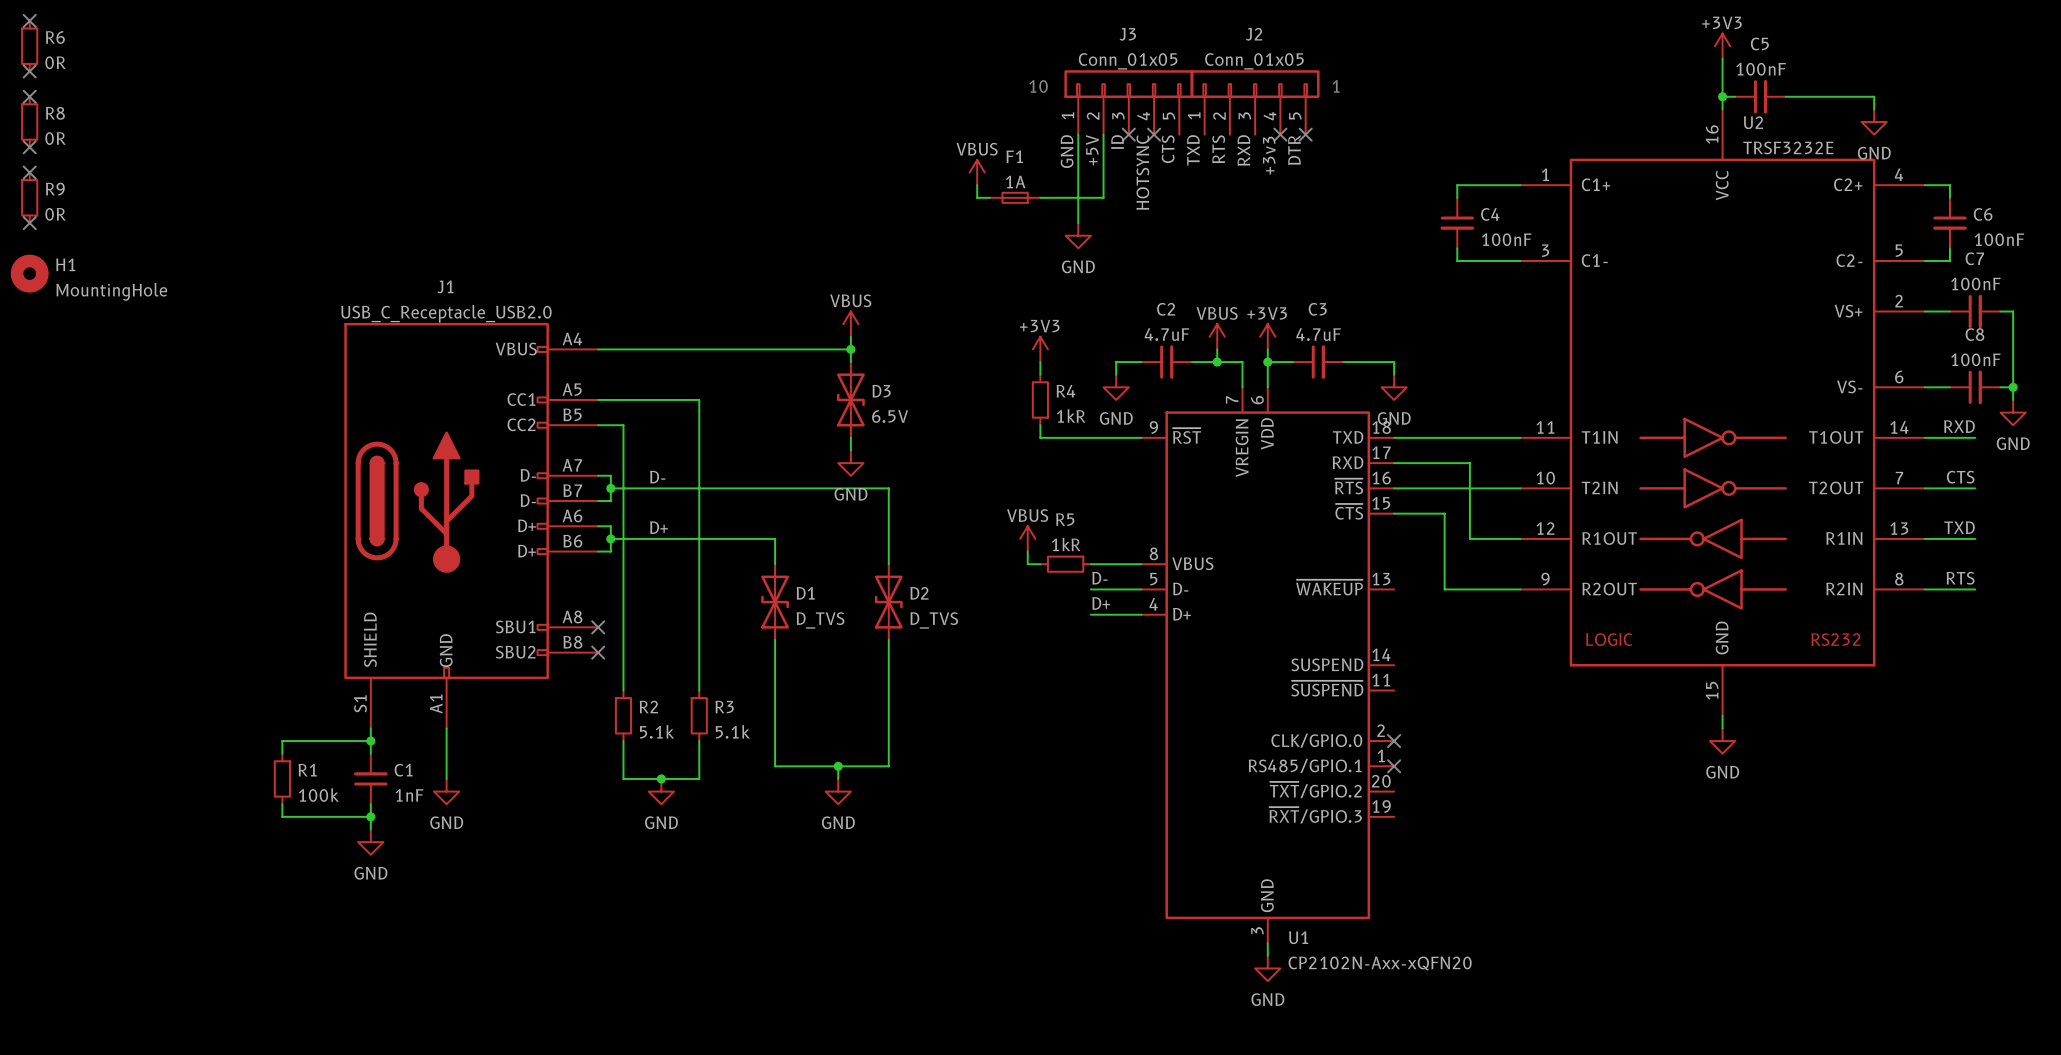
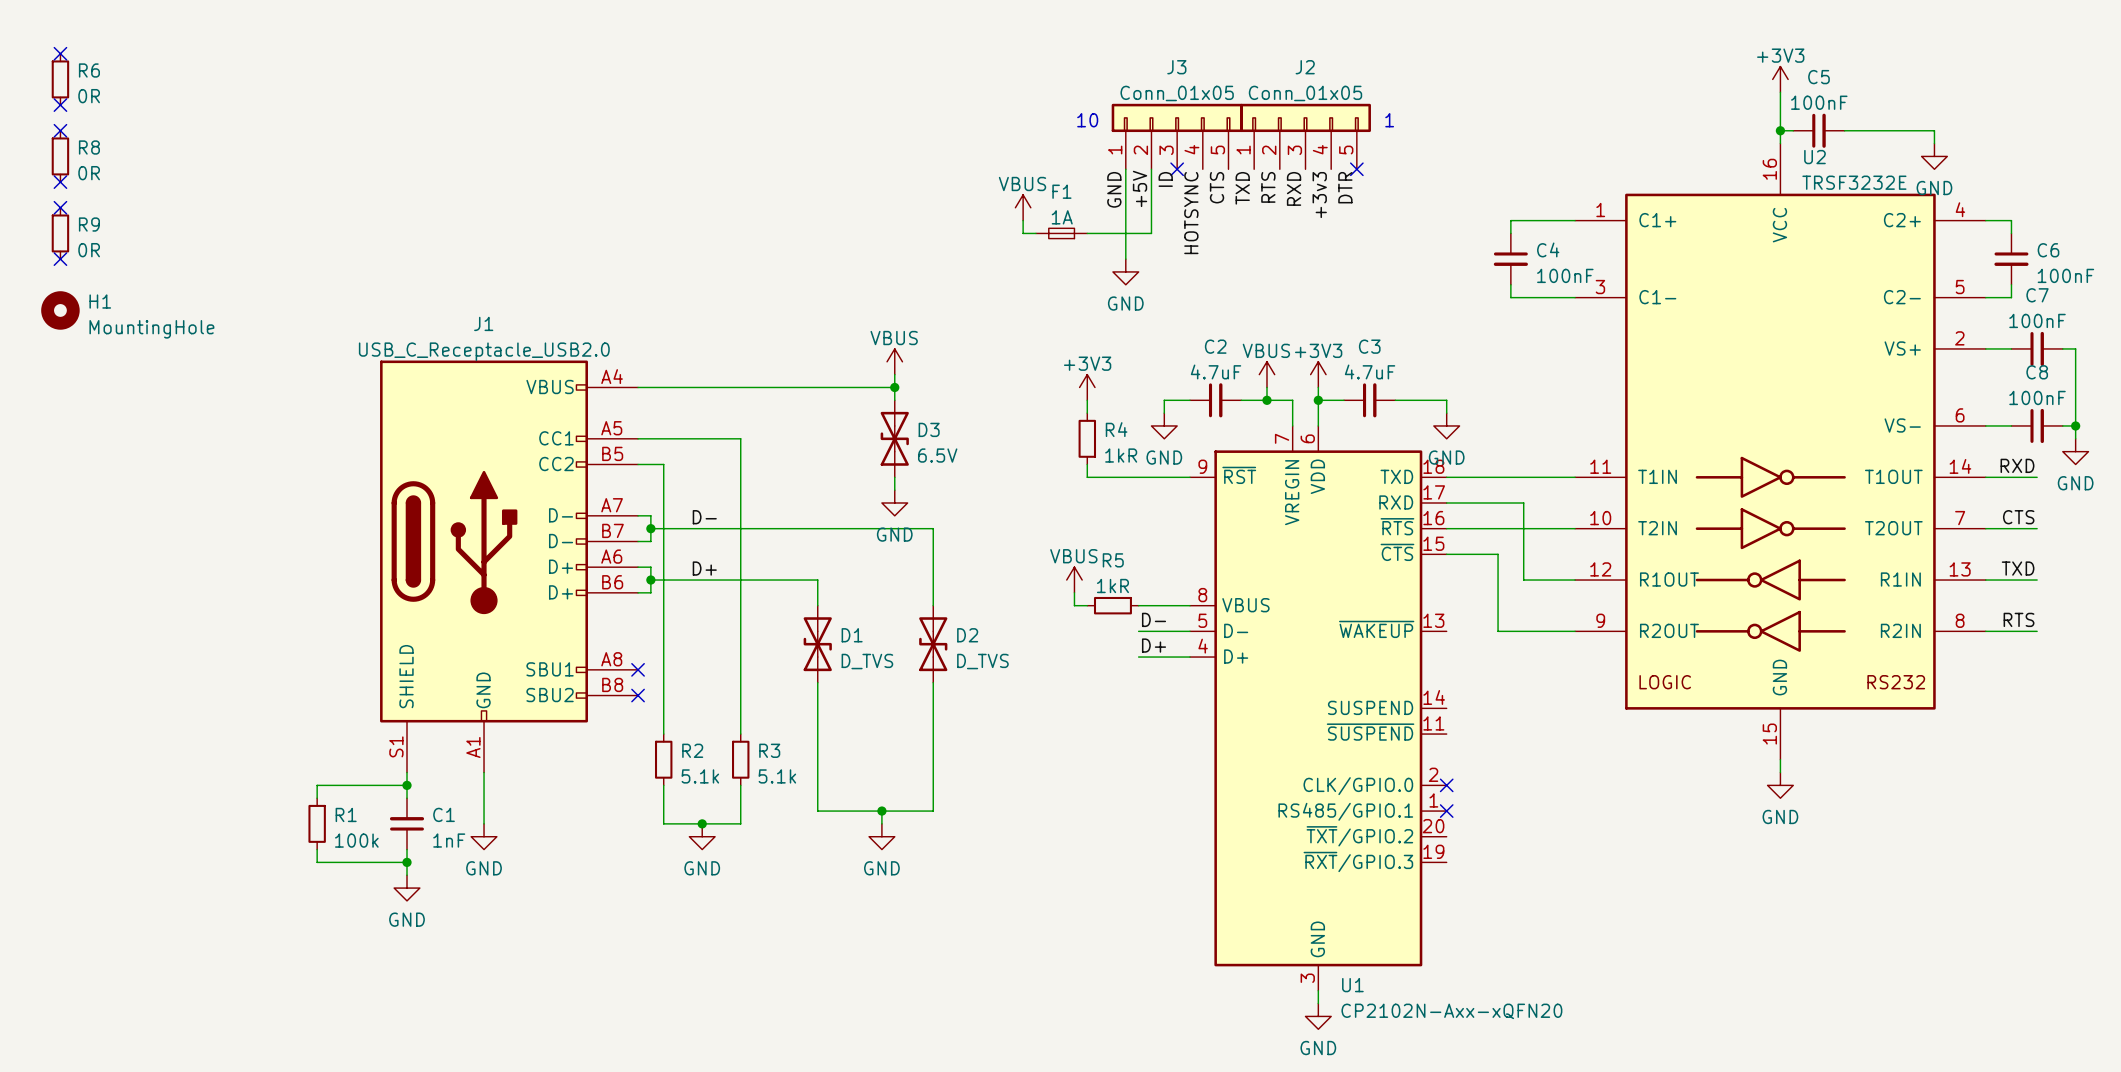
no-connect mark: (1154, 134) -> none
no-connect mark: (1280, 134) -> none

